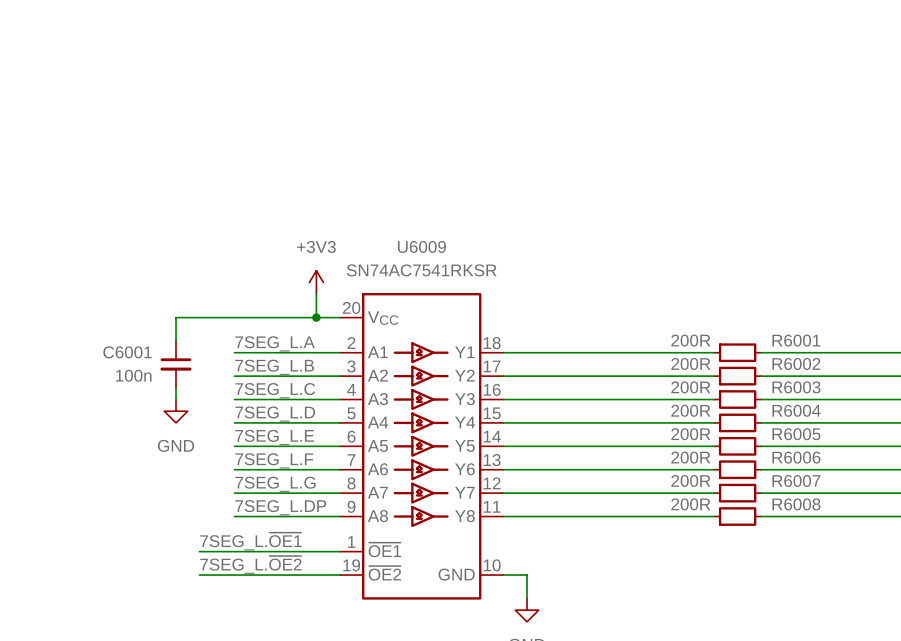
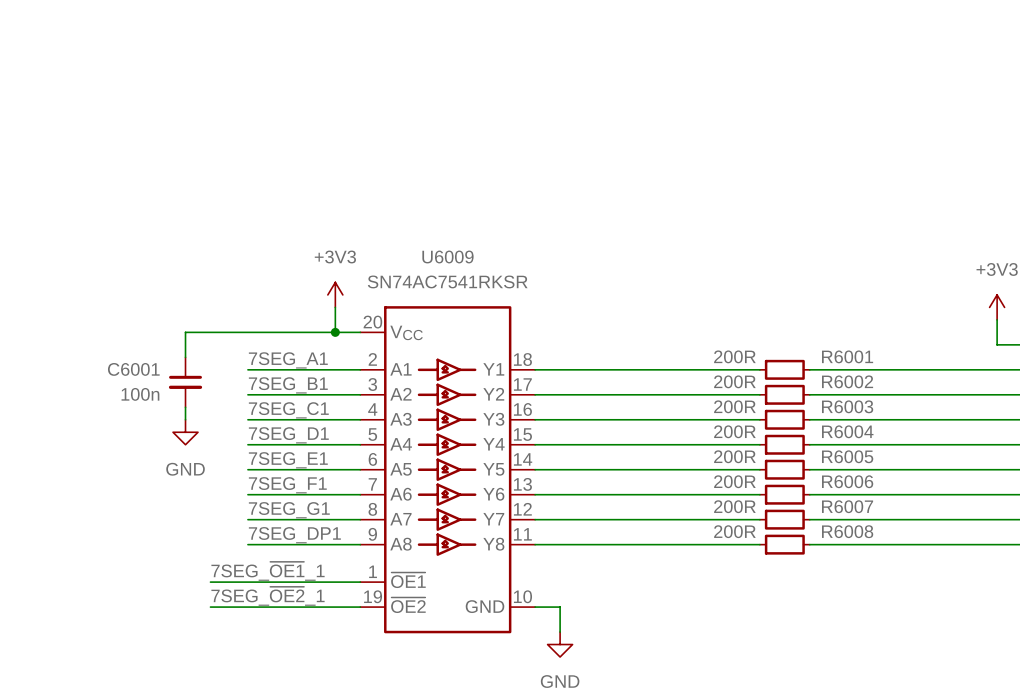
label: 7SEG_L.A (275, 343) -> 7SEG_A1 (288, 360)
label: 7SEG_L.B (274, 367) -> 7SEG_B1 (288, 385)
label: 7SEG_L.C (275, 390) -> 7SEG_C1 (288, 410)
label: 7SEG_L.D (275, 414) -> 7SEG_D1 (288, 435)
label: 7SEG_L.E (274, 437) -> 7SEG_E1 (288, 460)
label: 7SEG_L.F (274, 460) -> 7SEG_F1 (287, 485)
label: 7SEG_L.G (275, 484) -> 7SEG_G1 (289, 510)
label: 7SEG_L.DP (280, 507) -> 7SEG_DP1 (294, 535)
label: 7SEG_L.~{OE1} (250, 541) -> 7SEG_~{OE1}_1 (268, 571)
label: 7SEG_L.~{OE2} (250, 564) -> 7SEG_~{OE2}_1 (268, 596)

